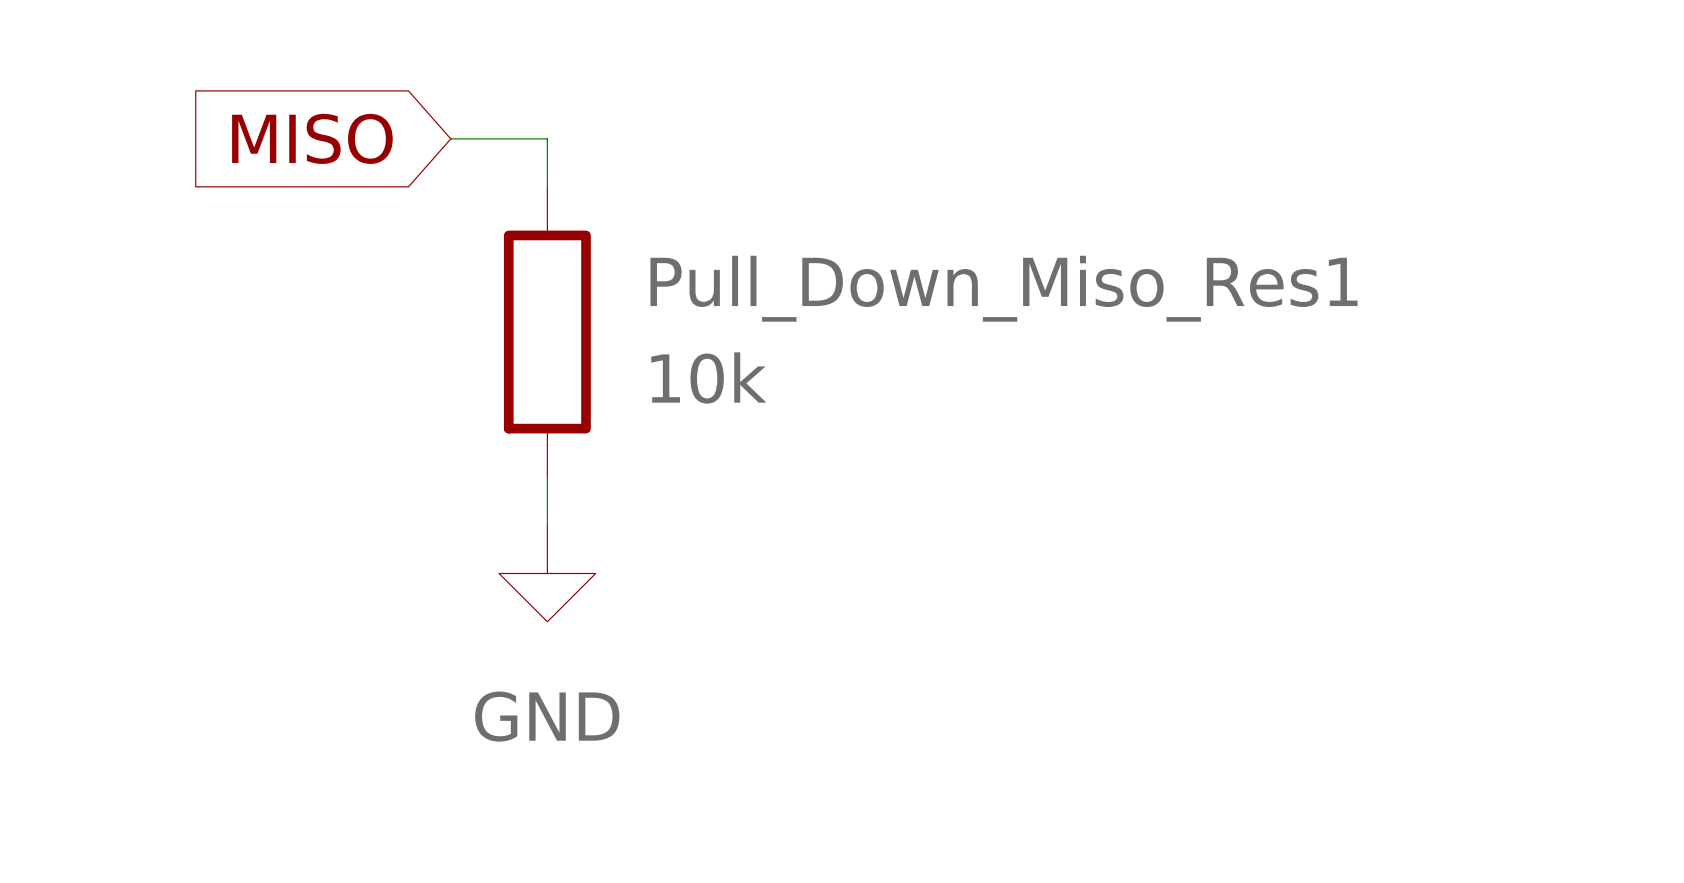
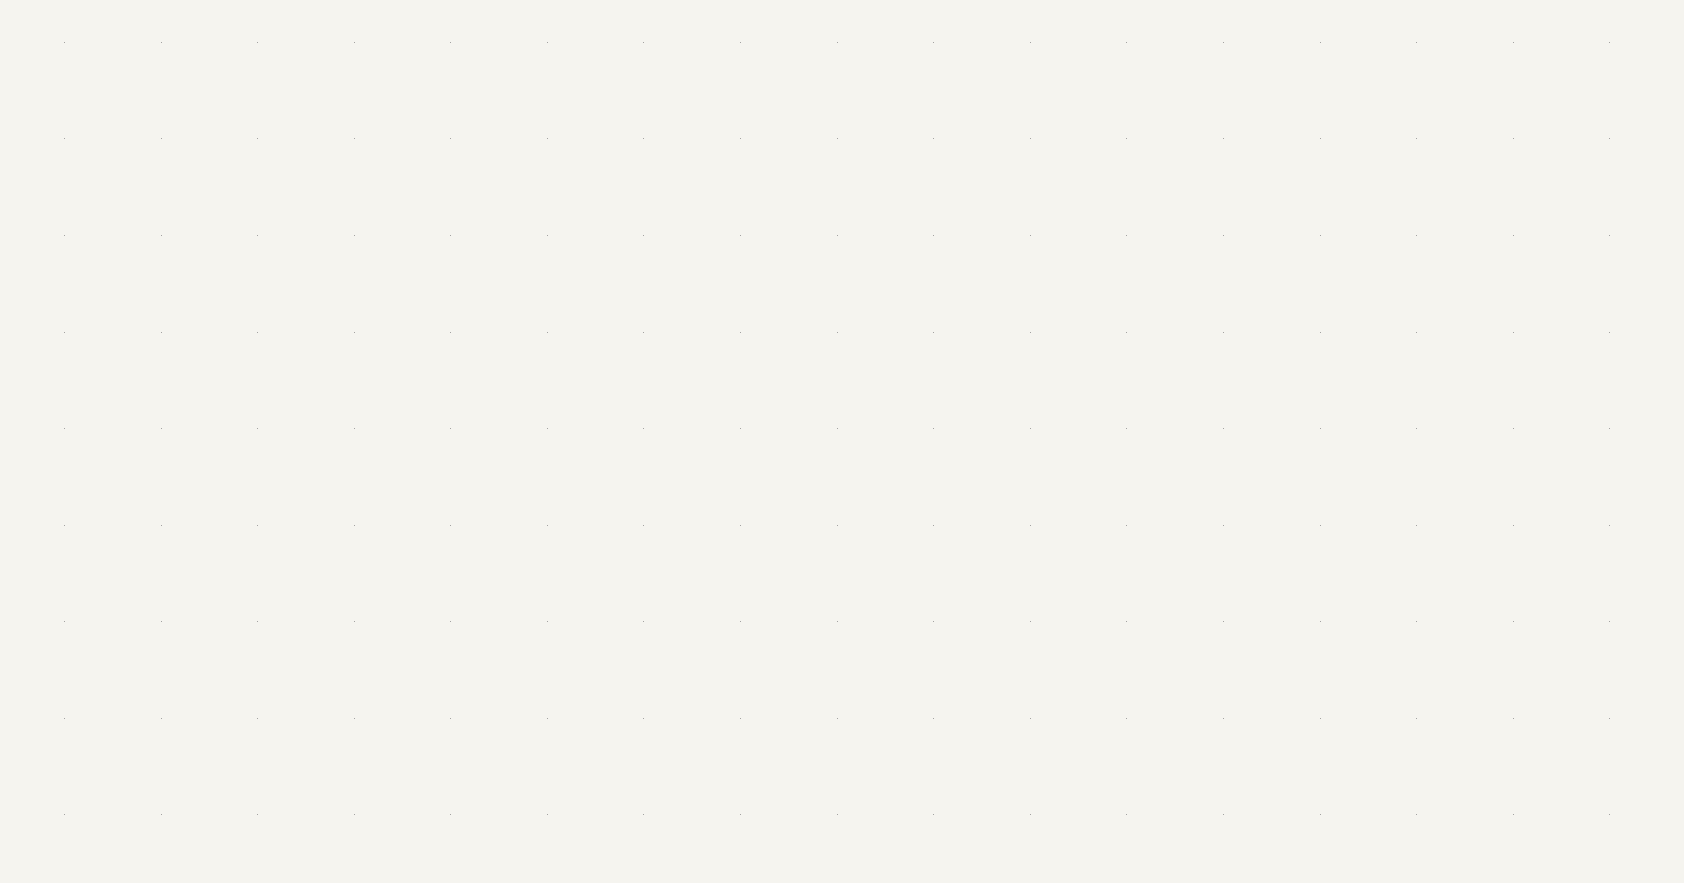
global label: MISO (312, 138) -> none
wire: (450, 138) (547, 138) (547, 187) -> none
Pull_Down_Miso_Res1: 10k (547, 332) -> none
wire: (547, 476) (547, 525) -> none
power symbol: GND (547, 573) -> none

